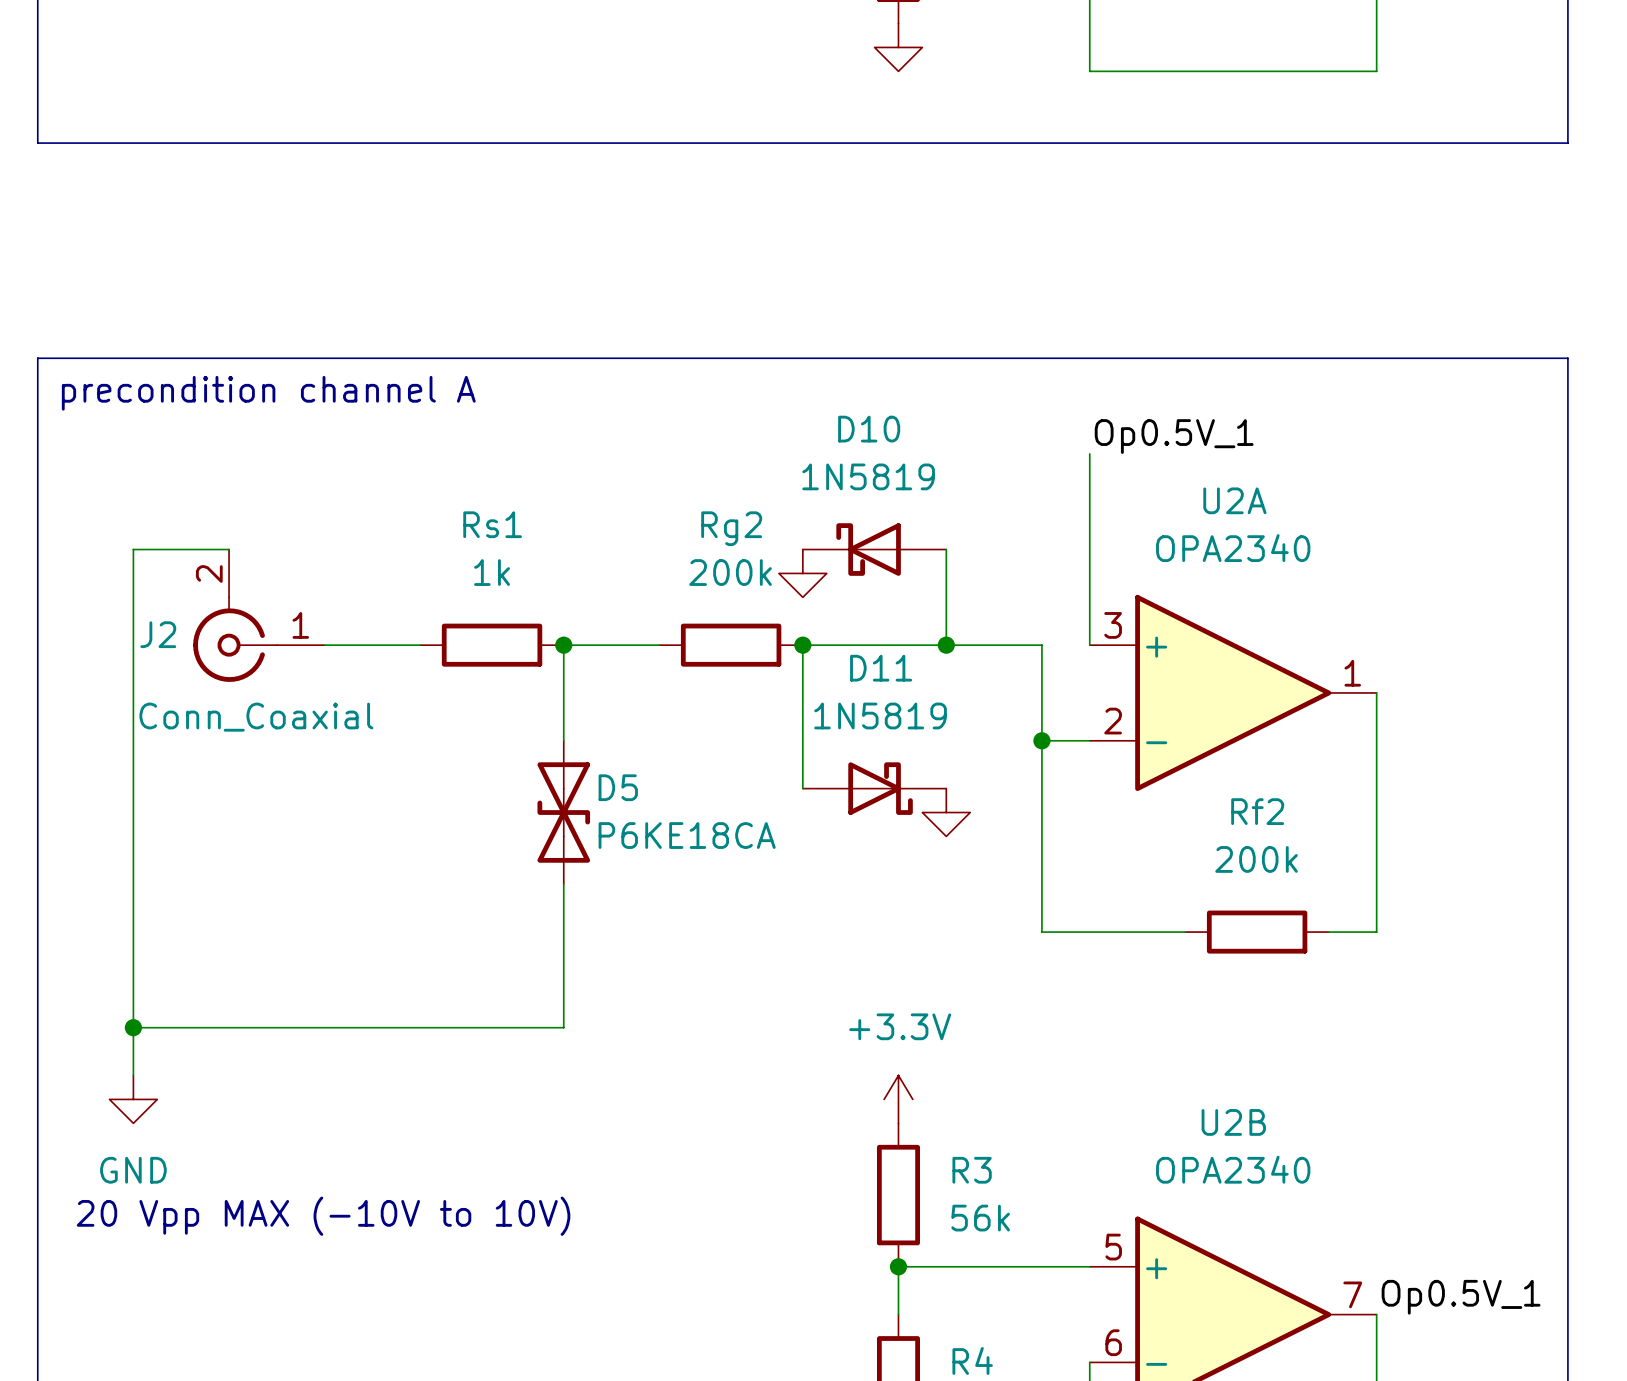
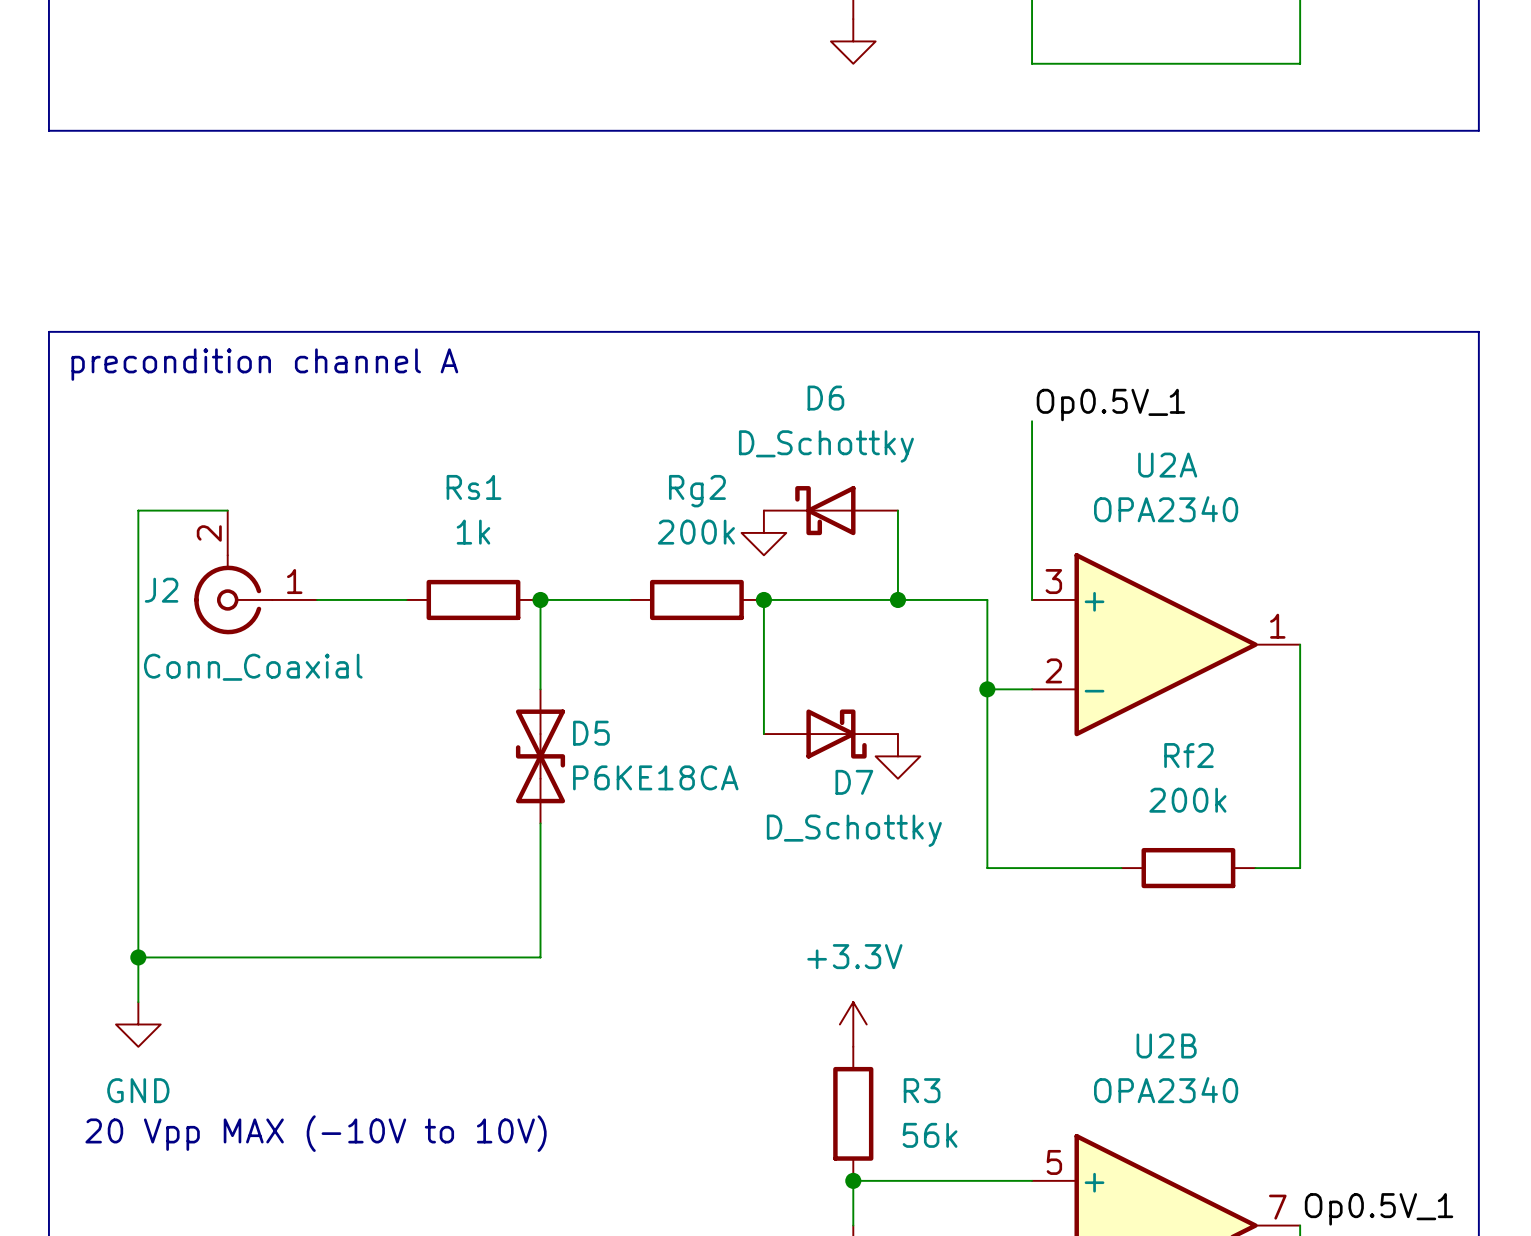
D10 name: D10 (869, 429) -> D6 (825, 398)
D10 value: 1N5819 (868, 476) -> D_Schottky (826, 446)
D11 name: D11 (881, 668) -> D7 (854, 782)
D11 value: 1N5819 (880, 715) -> D_Schottky (854, 830)

